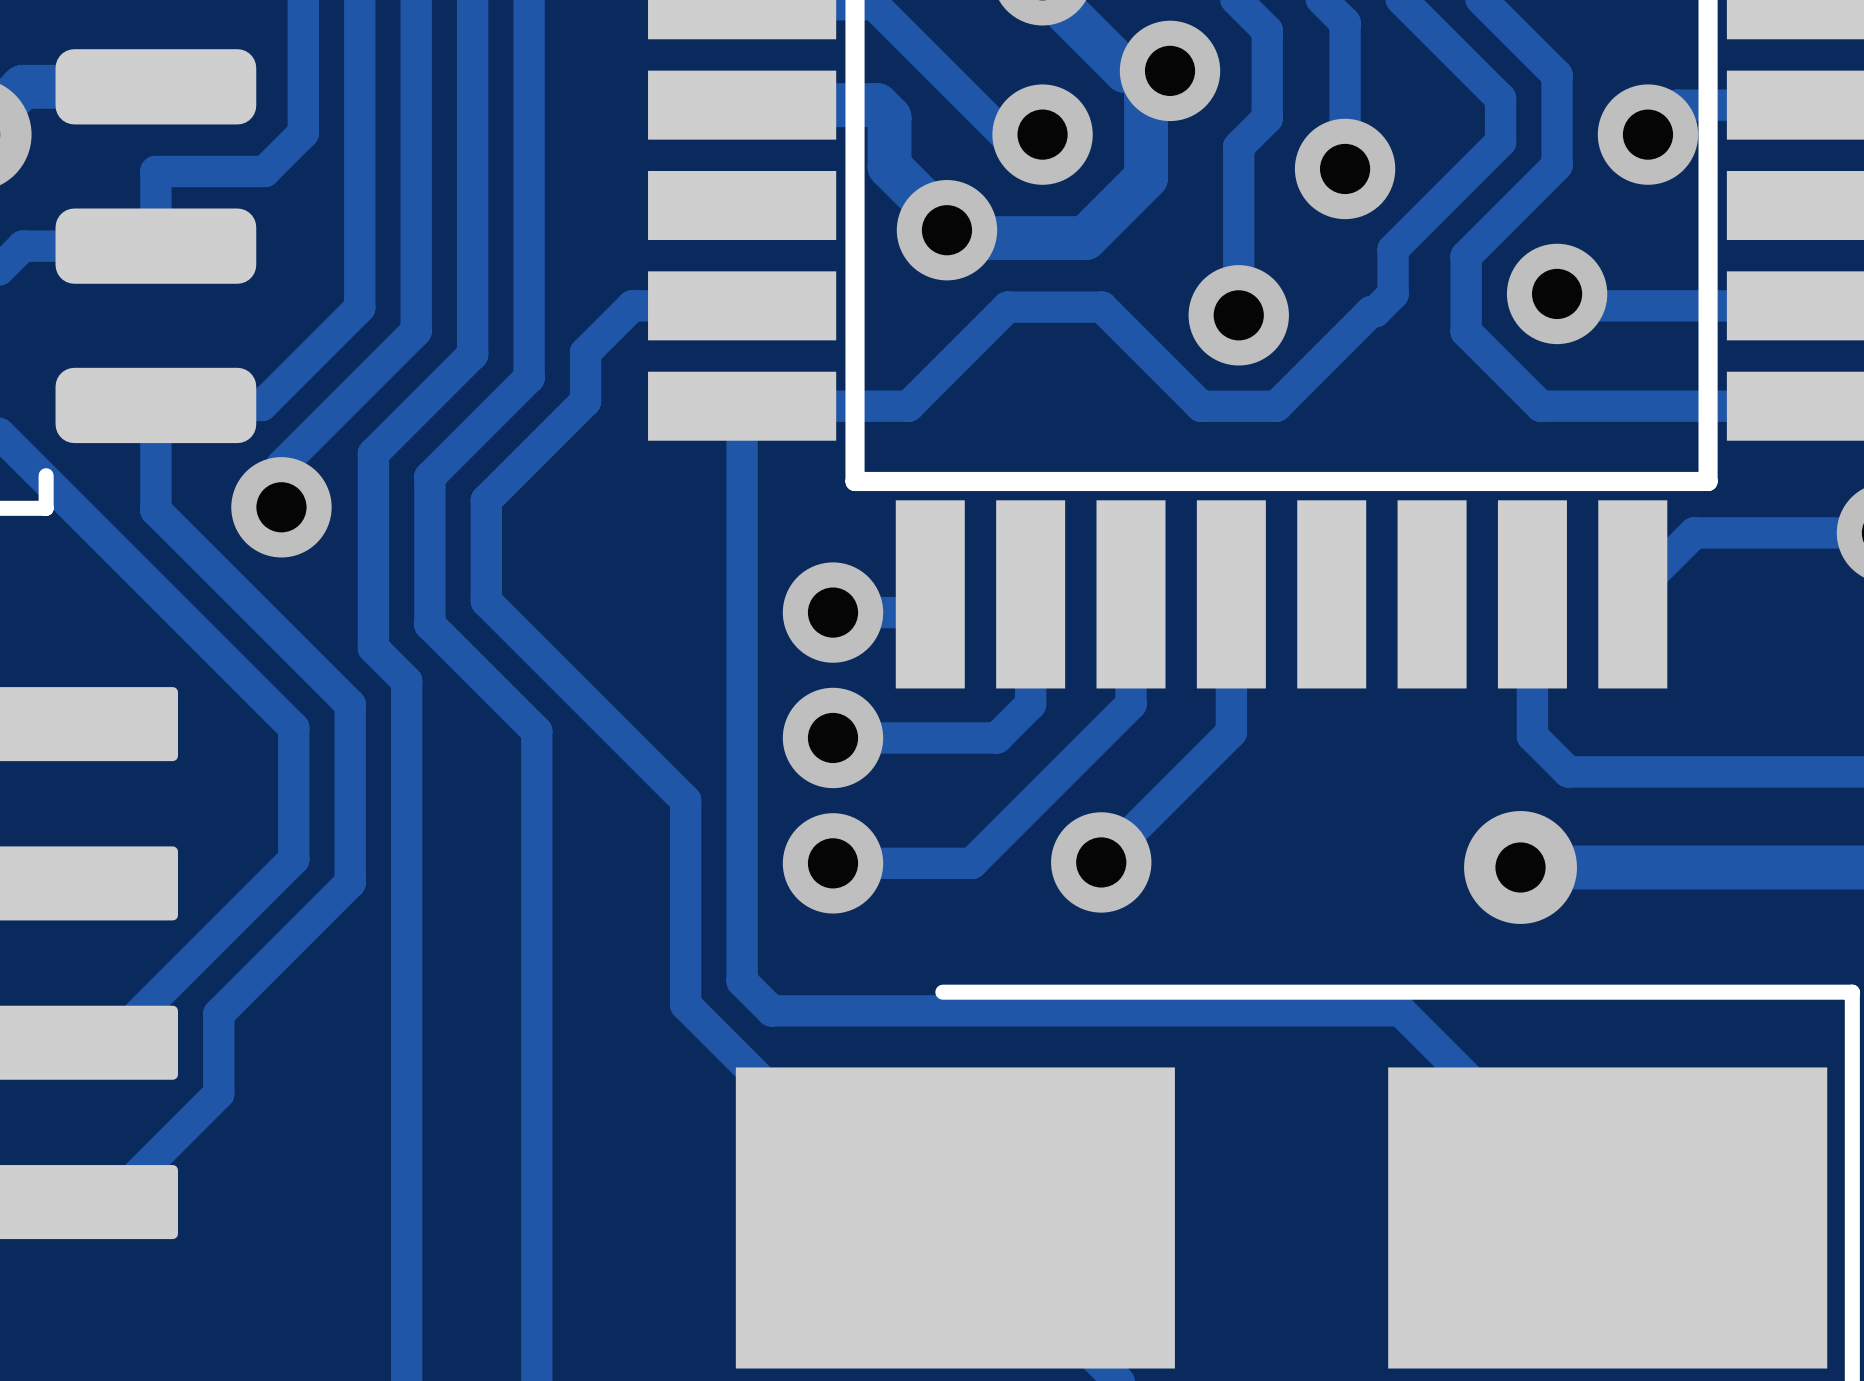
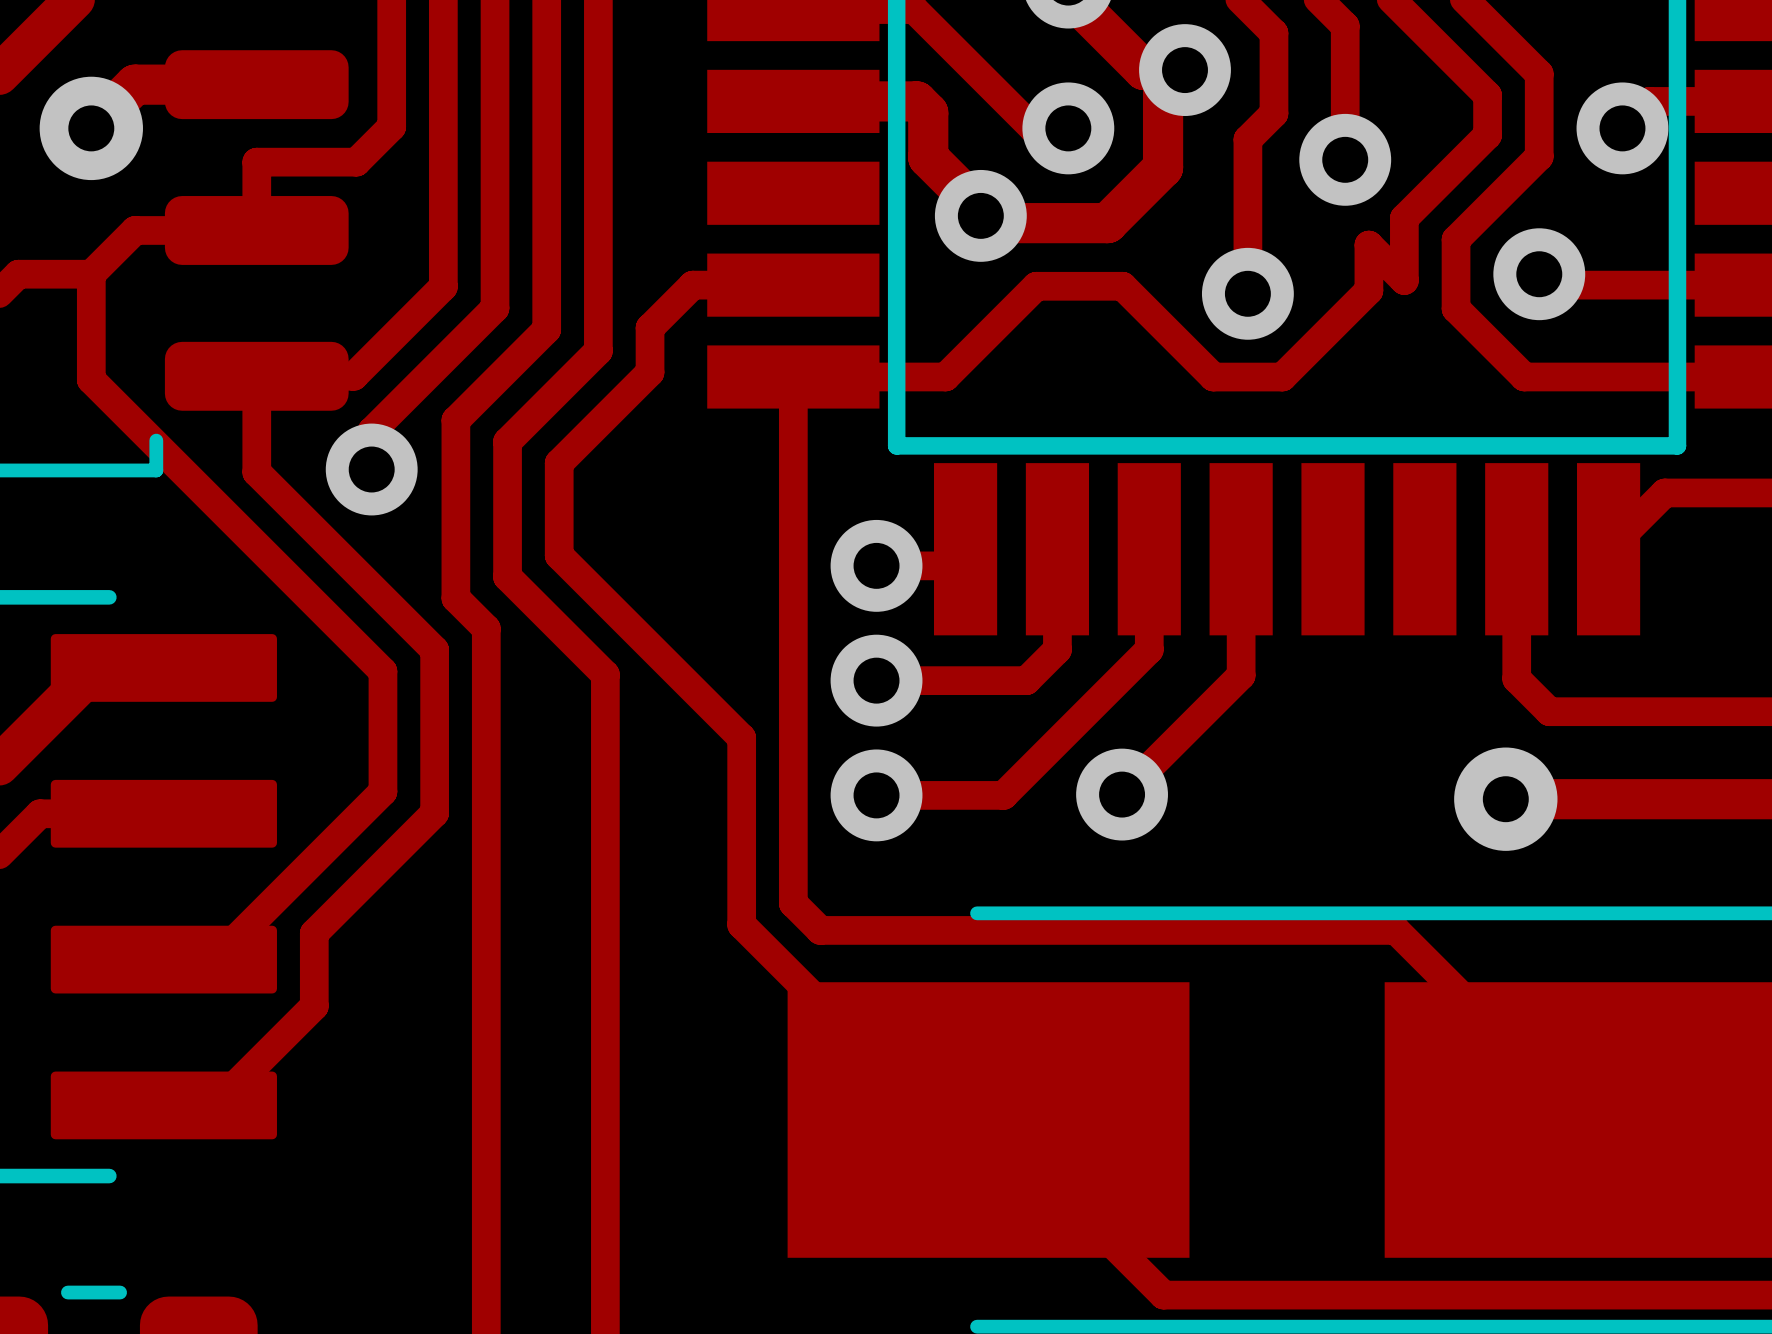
track: (1409, 232) (1393, 249) (1393, 293) (1375, 311) (1370, 311) -> (1404, 218) (1404, 280) (1368, 245) (1368, 290)

